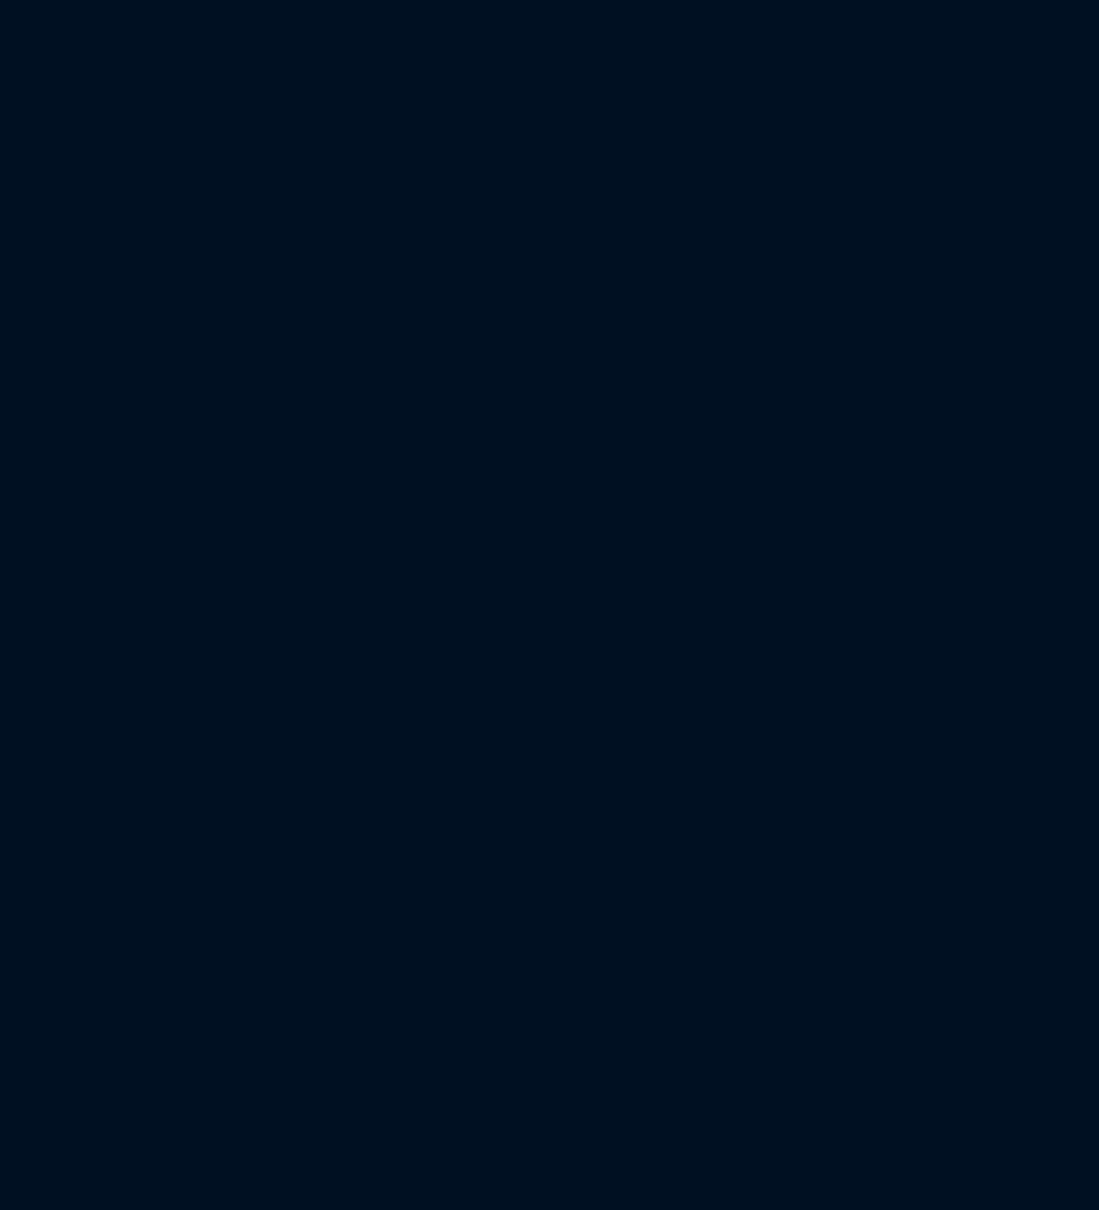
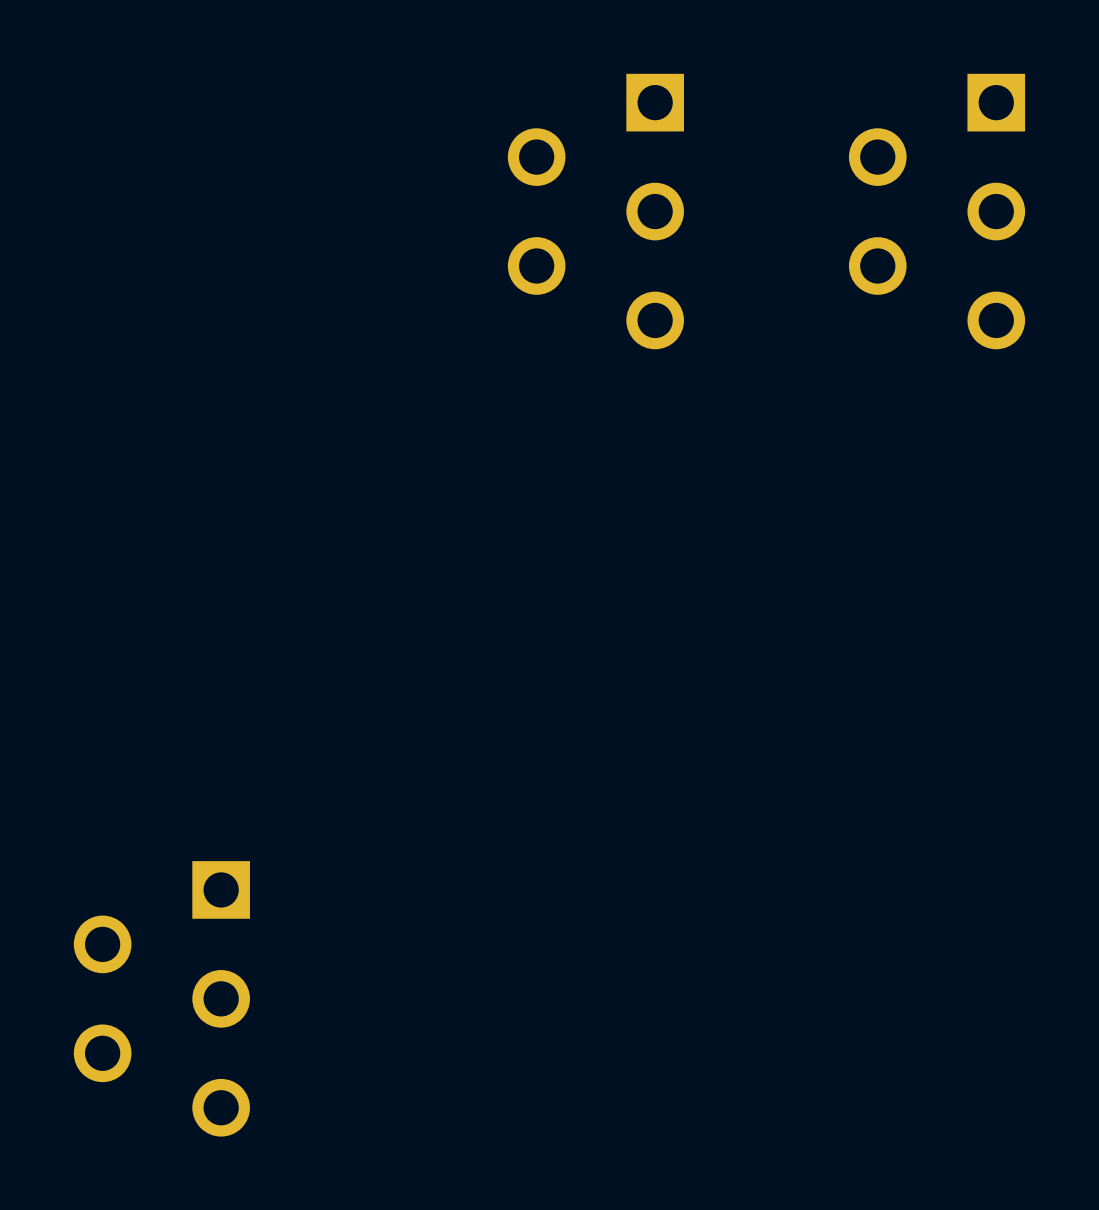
part: none -> (595, 211)
part: none -> (937, 211)
part: none -> (161, 998)

